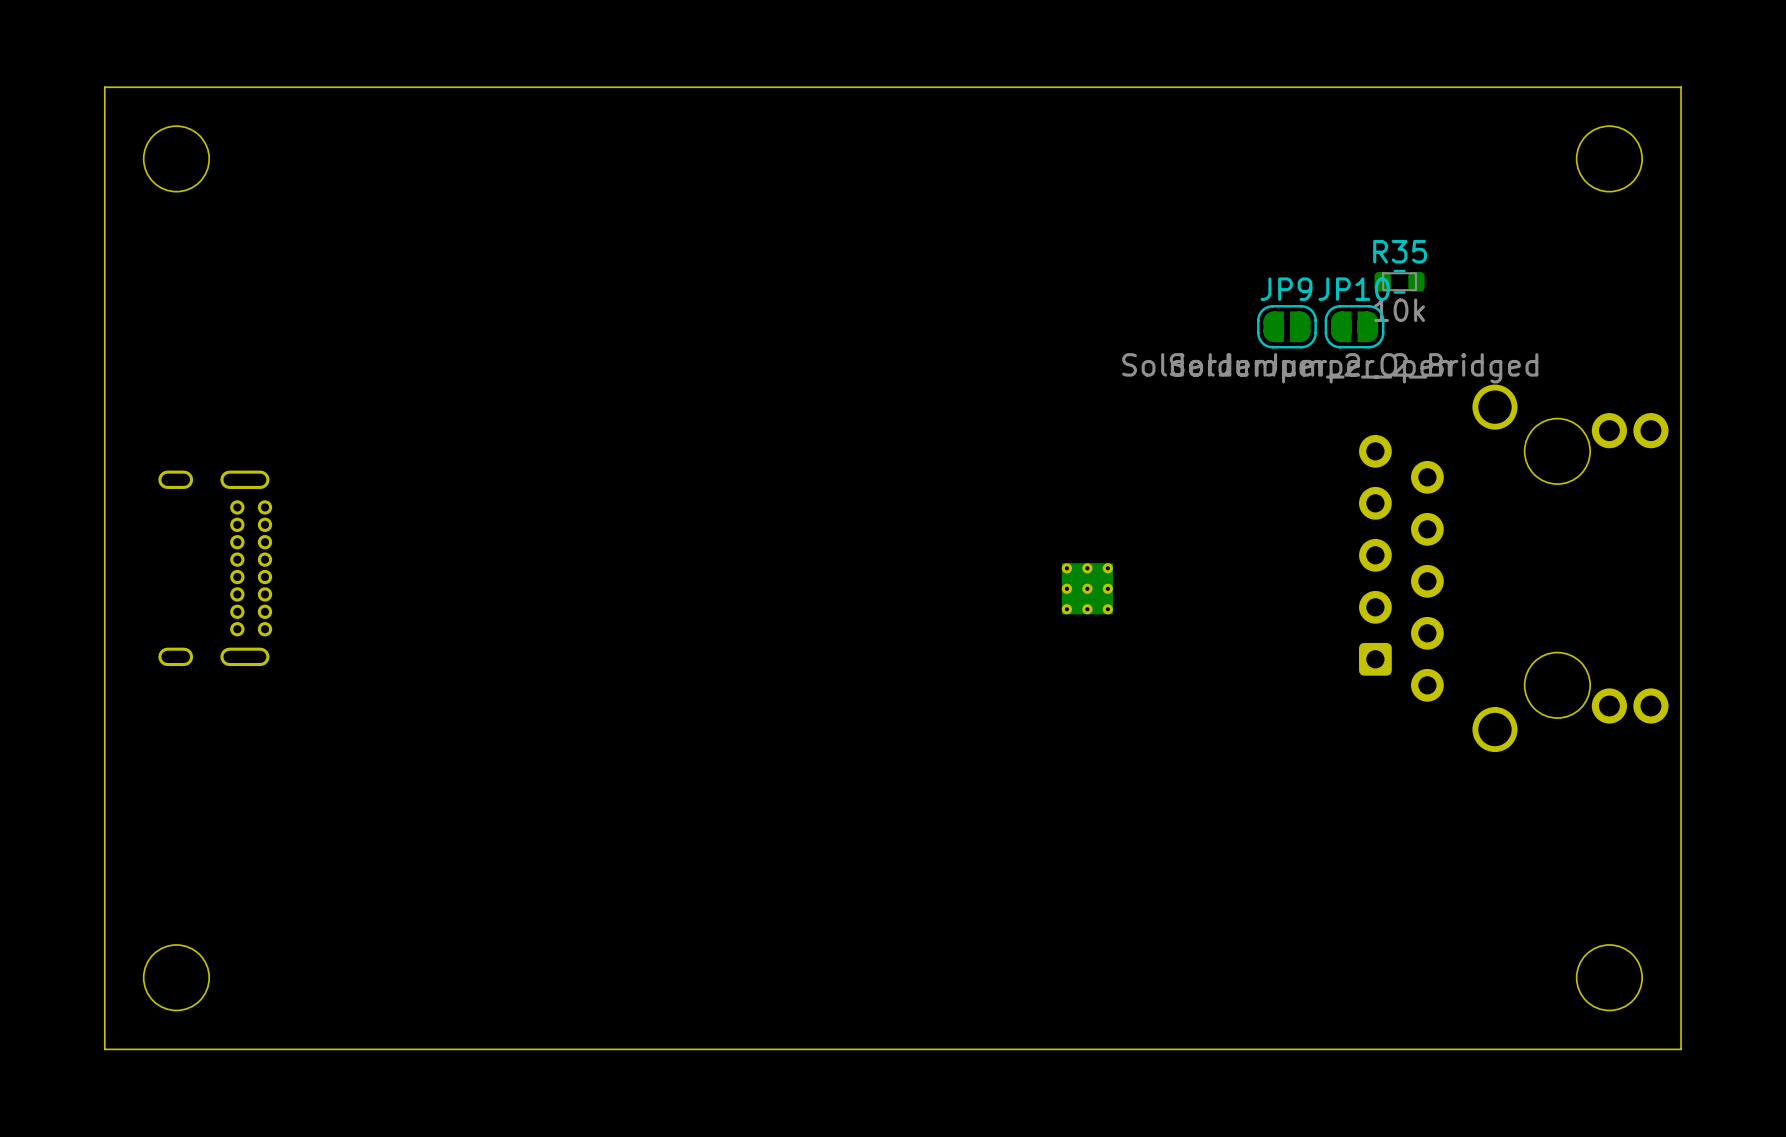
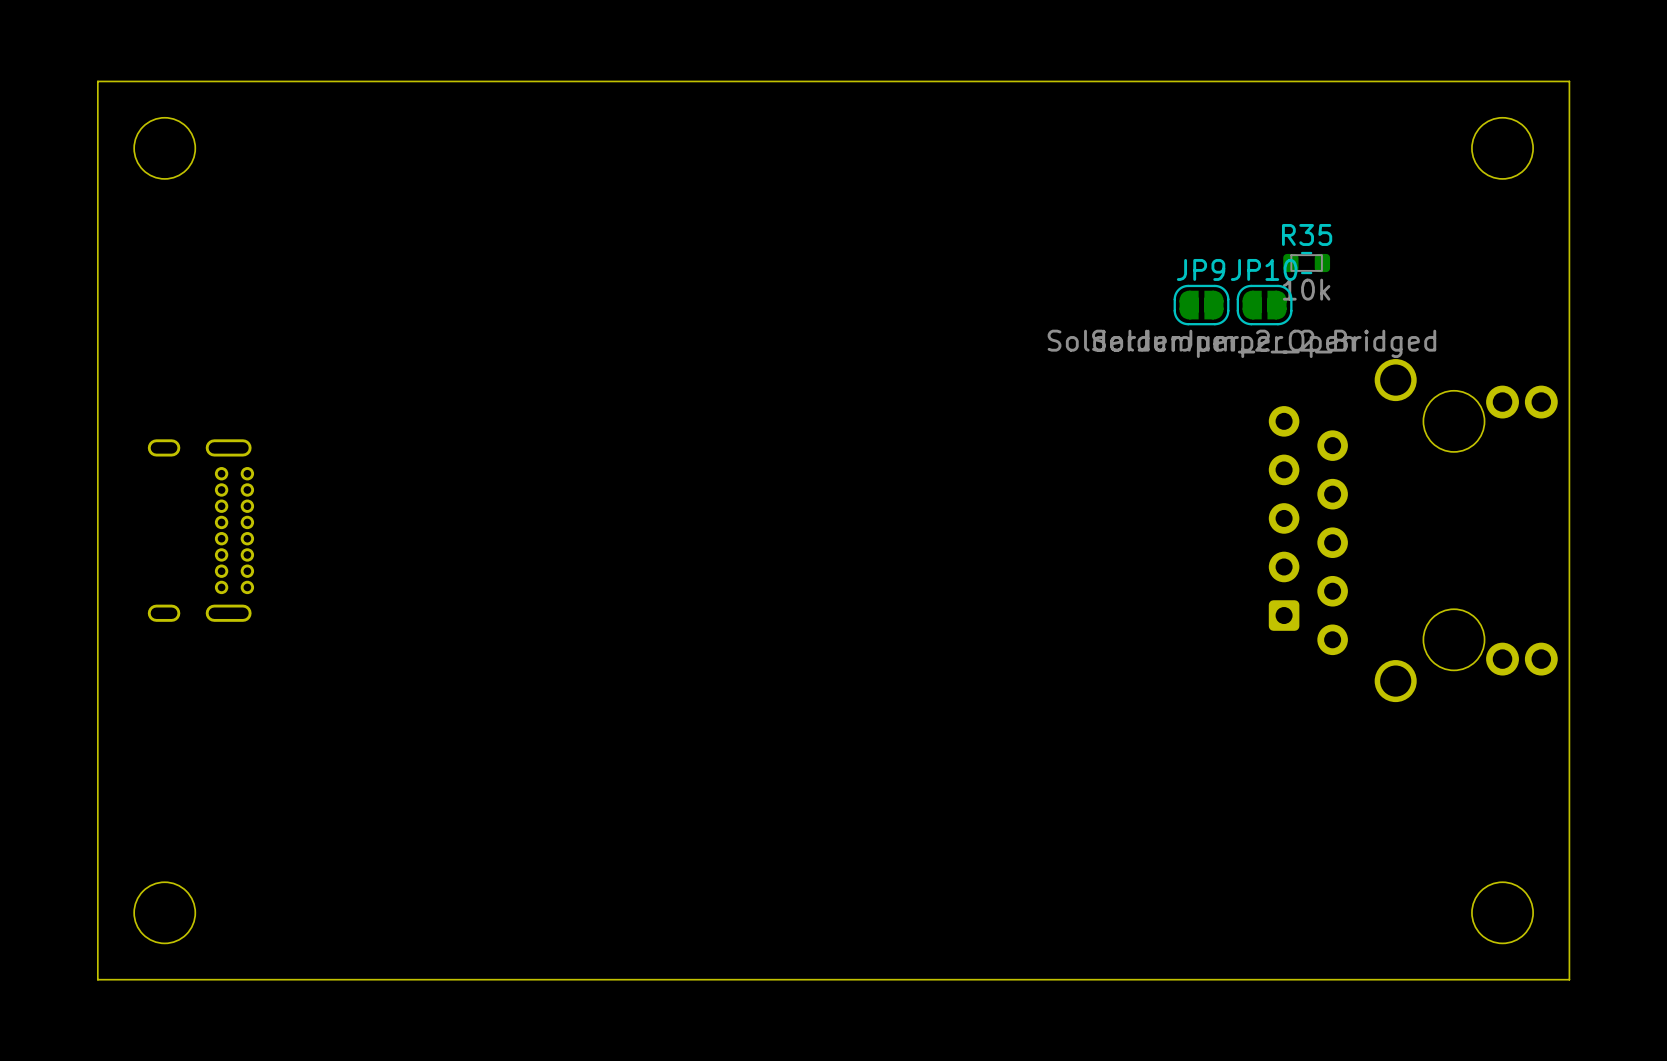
part: (1087, 588) -> none

